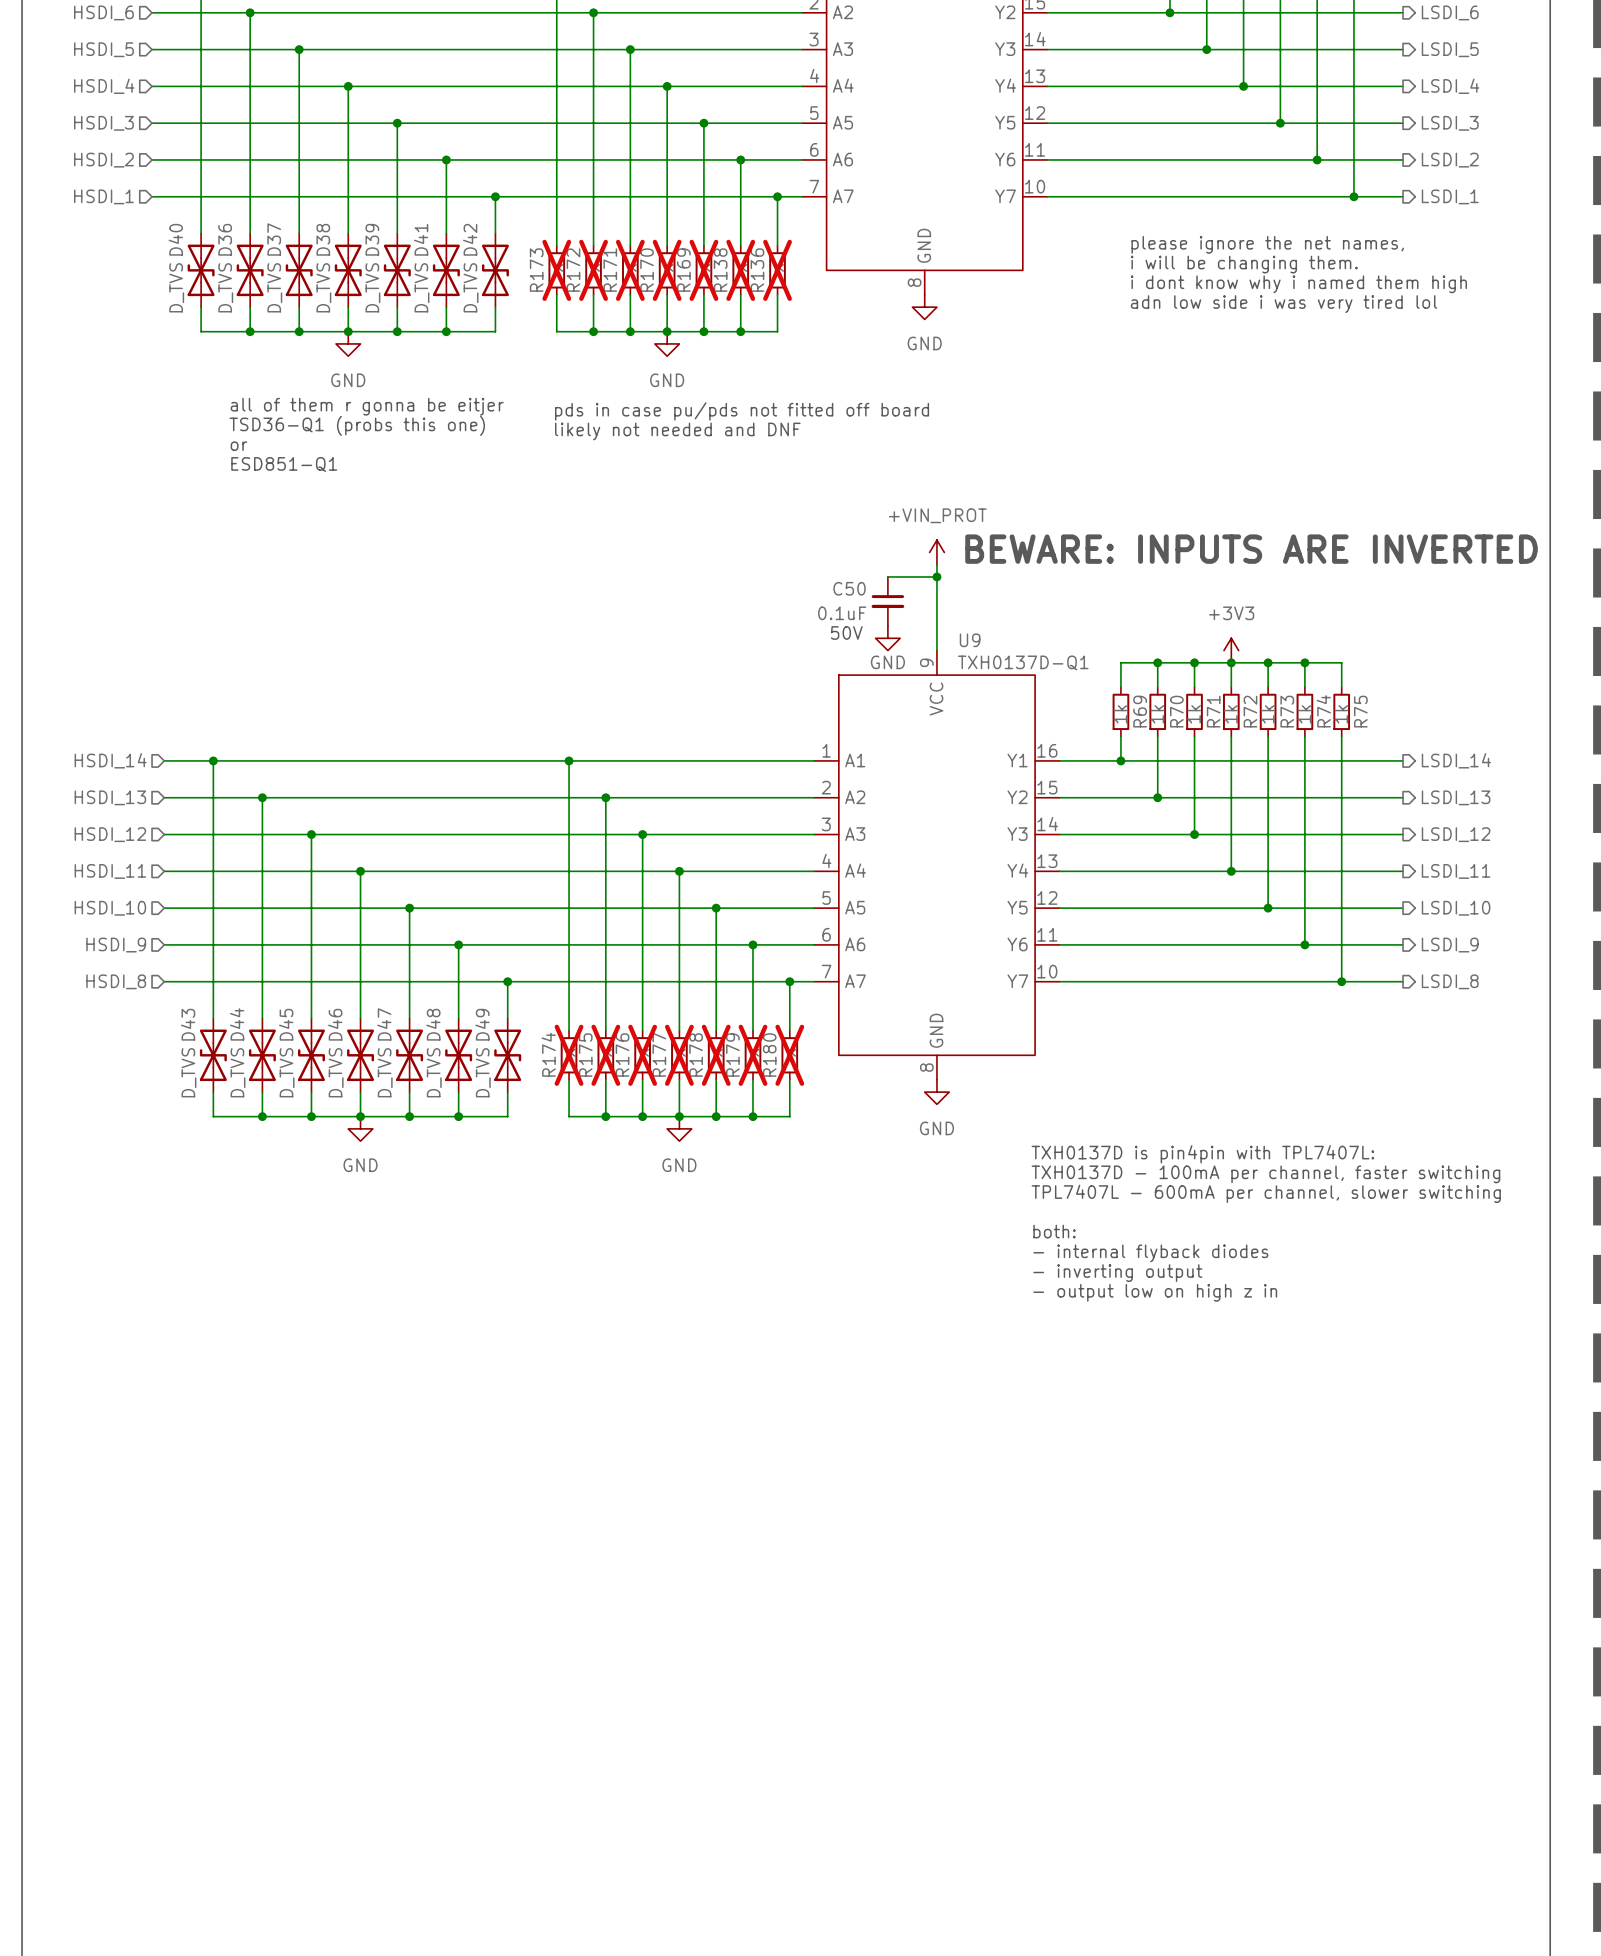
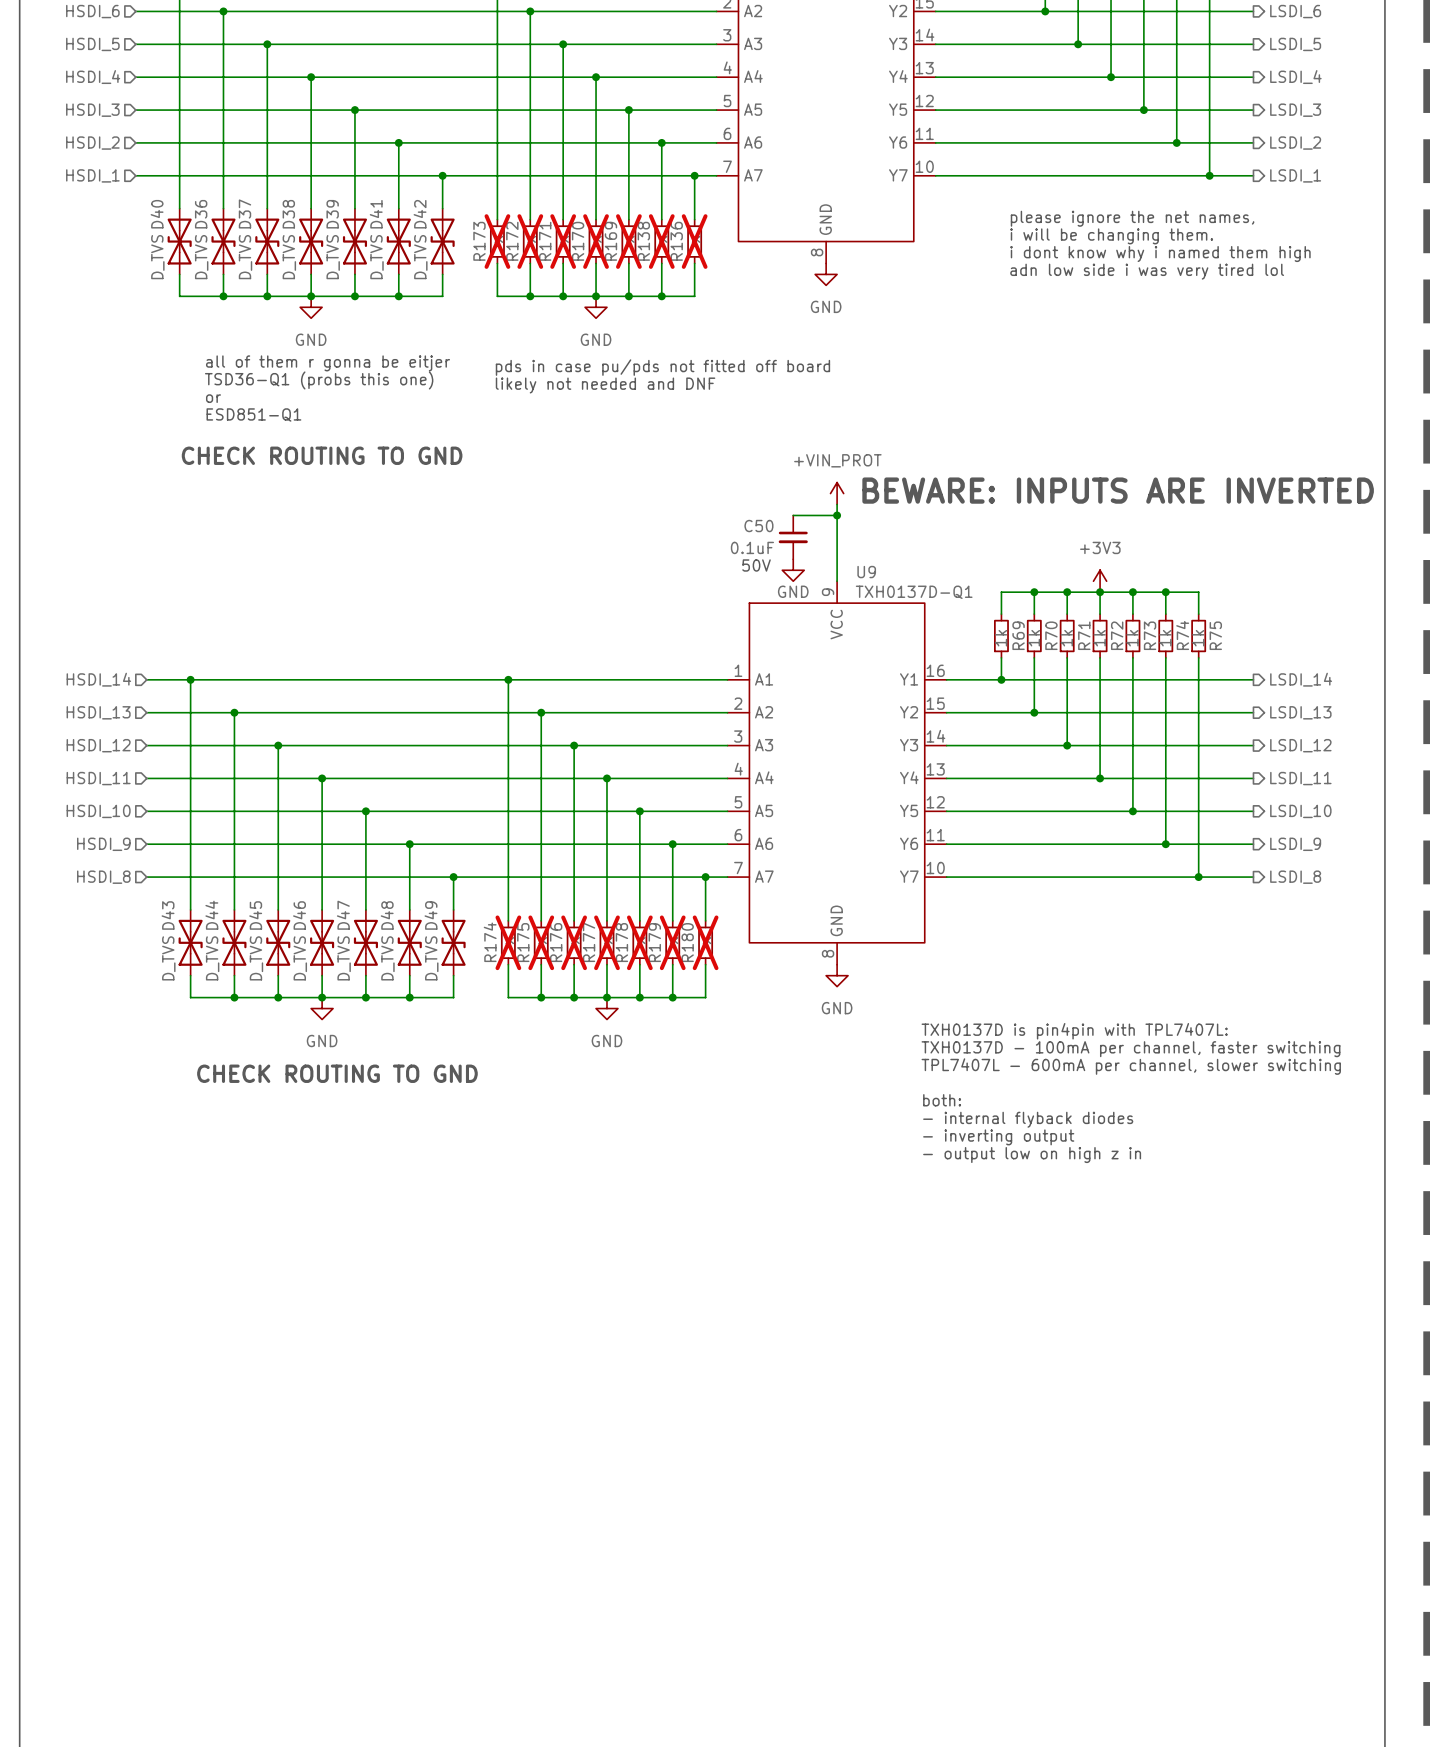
text: none -> CHECK ROUTING TO GND (322, 455)
text: none -> CHECK ROUTING TO GND (337, 1073)

